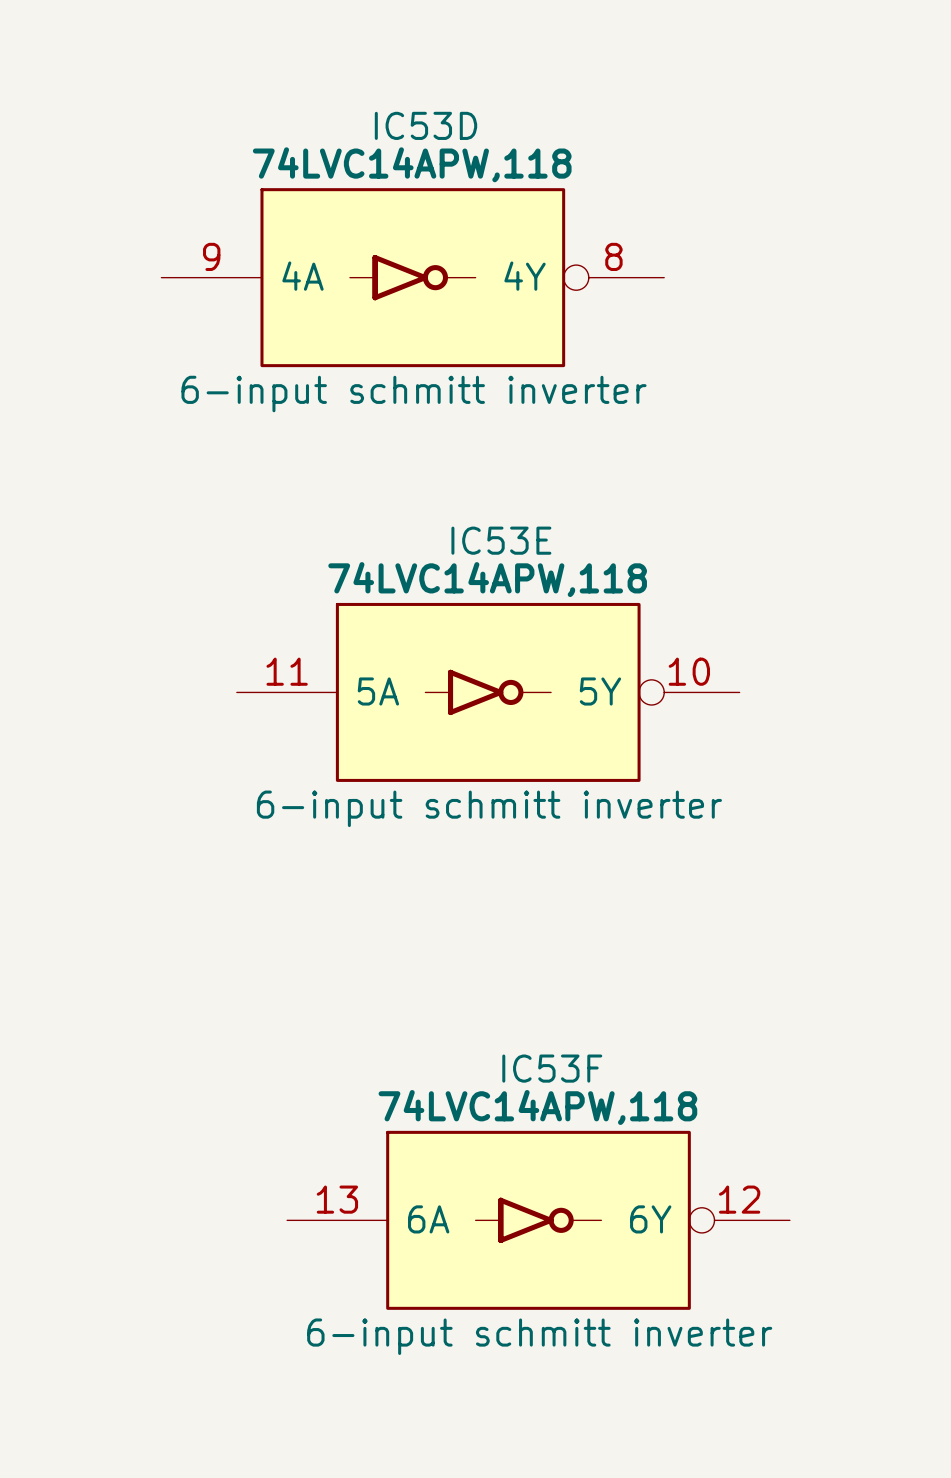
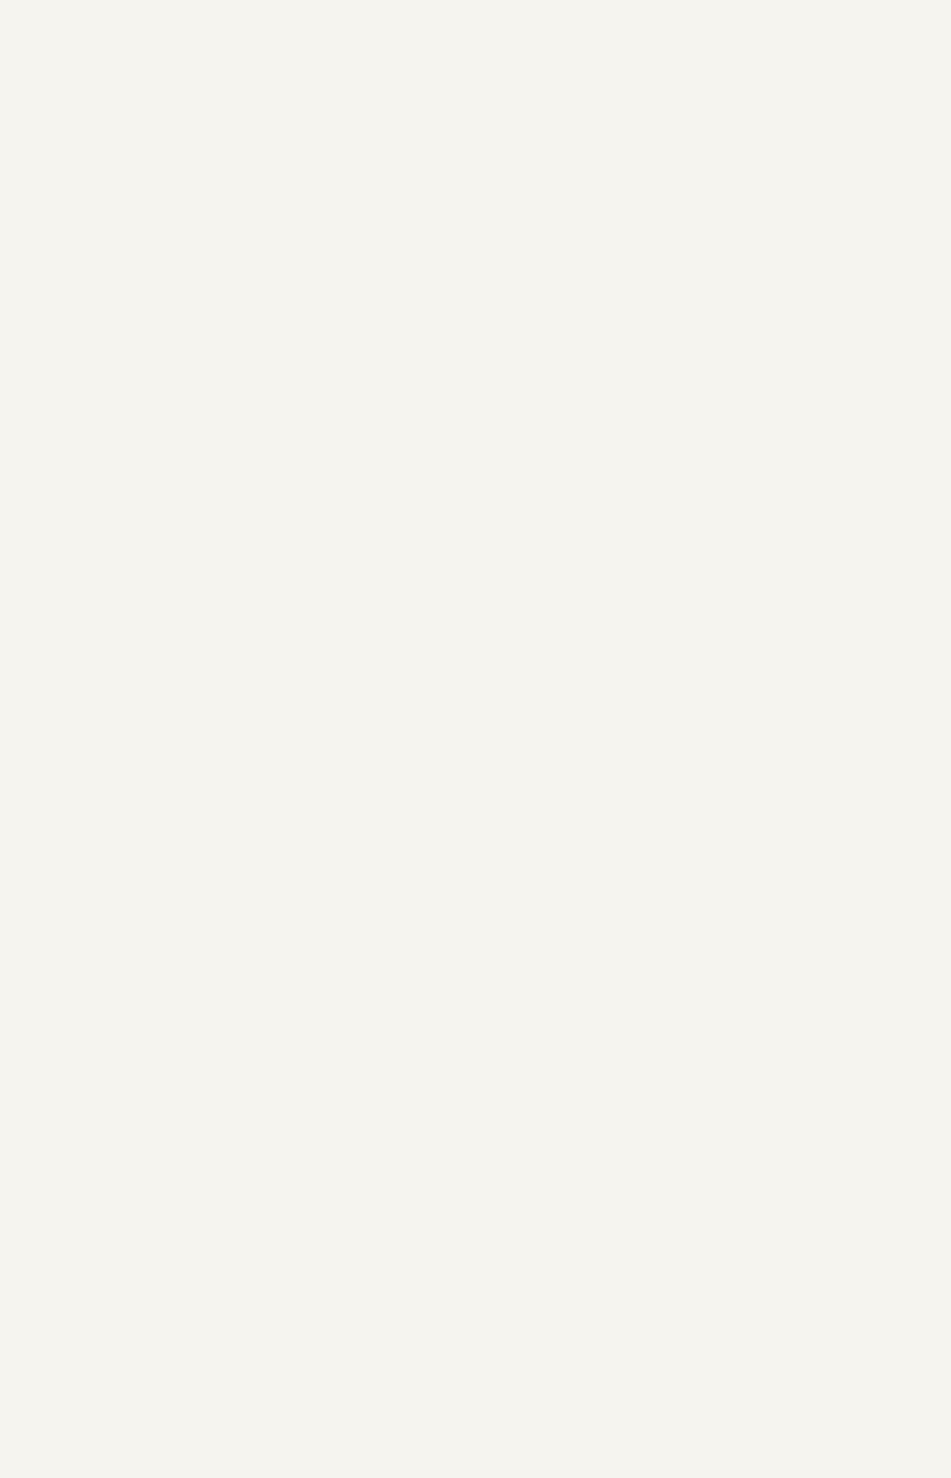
IC53D: 74LVC14APW,118 (412, 277) -> none
IC53E: 74LVC14APW,118 (488, 692) -> none
IC53F: 74LVC14APW,118 (538, 1220) -> none

